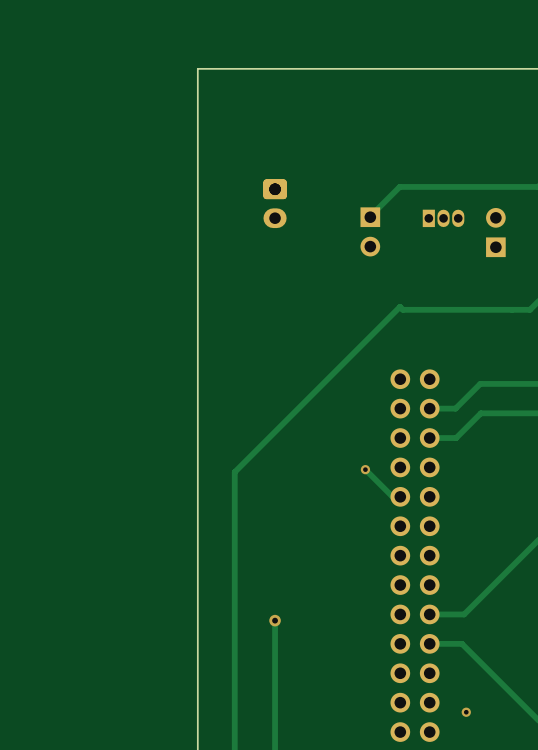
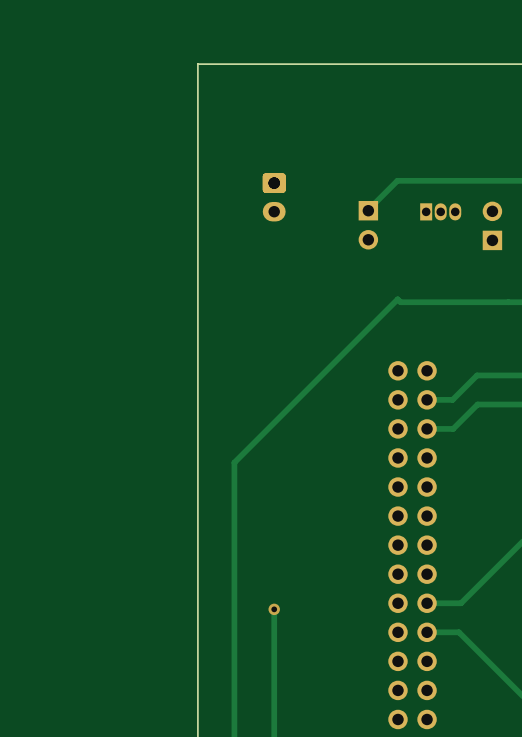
track: (365, 469) (392, 496) (400, 496) -> none
via: (365, 469) -> none
via: (466, 712) -> none

